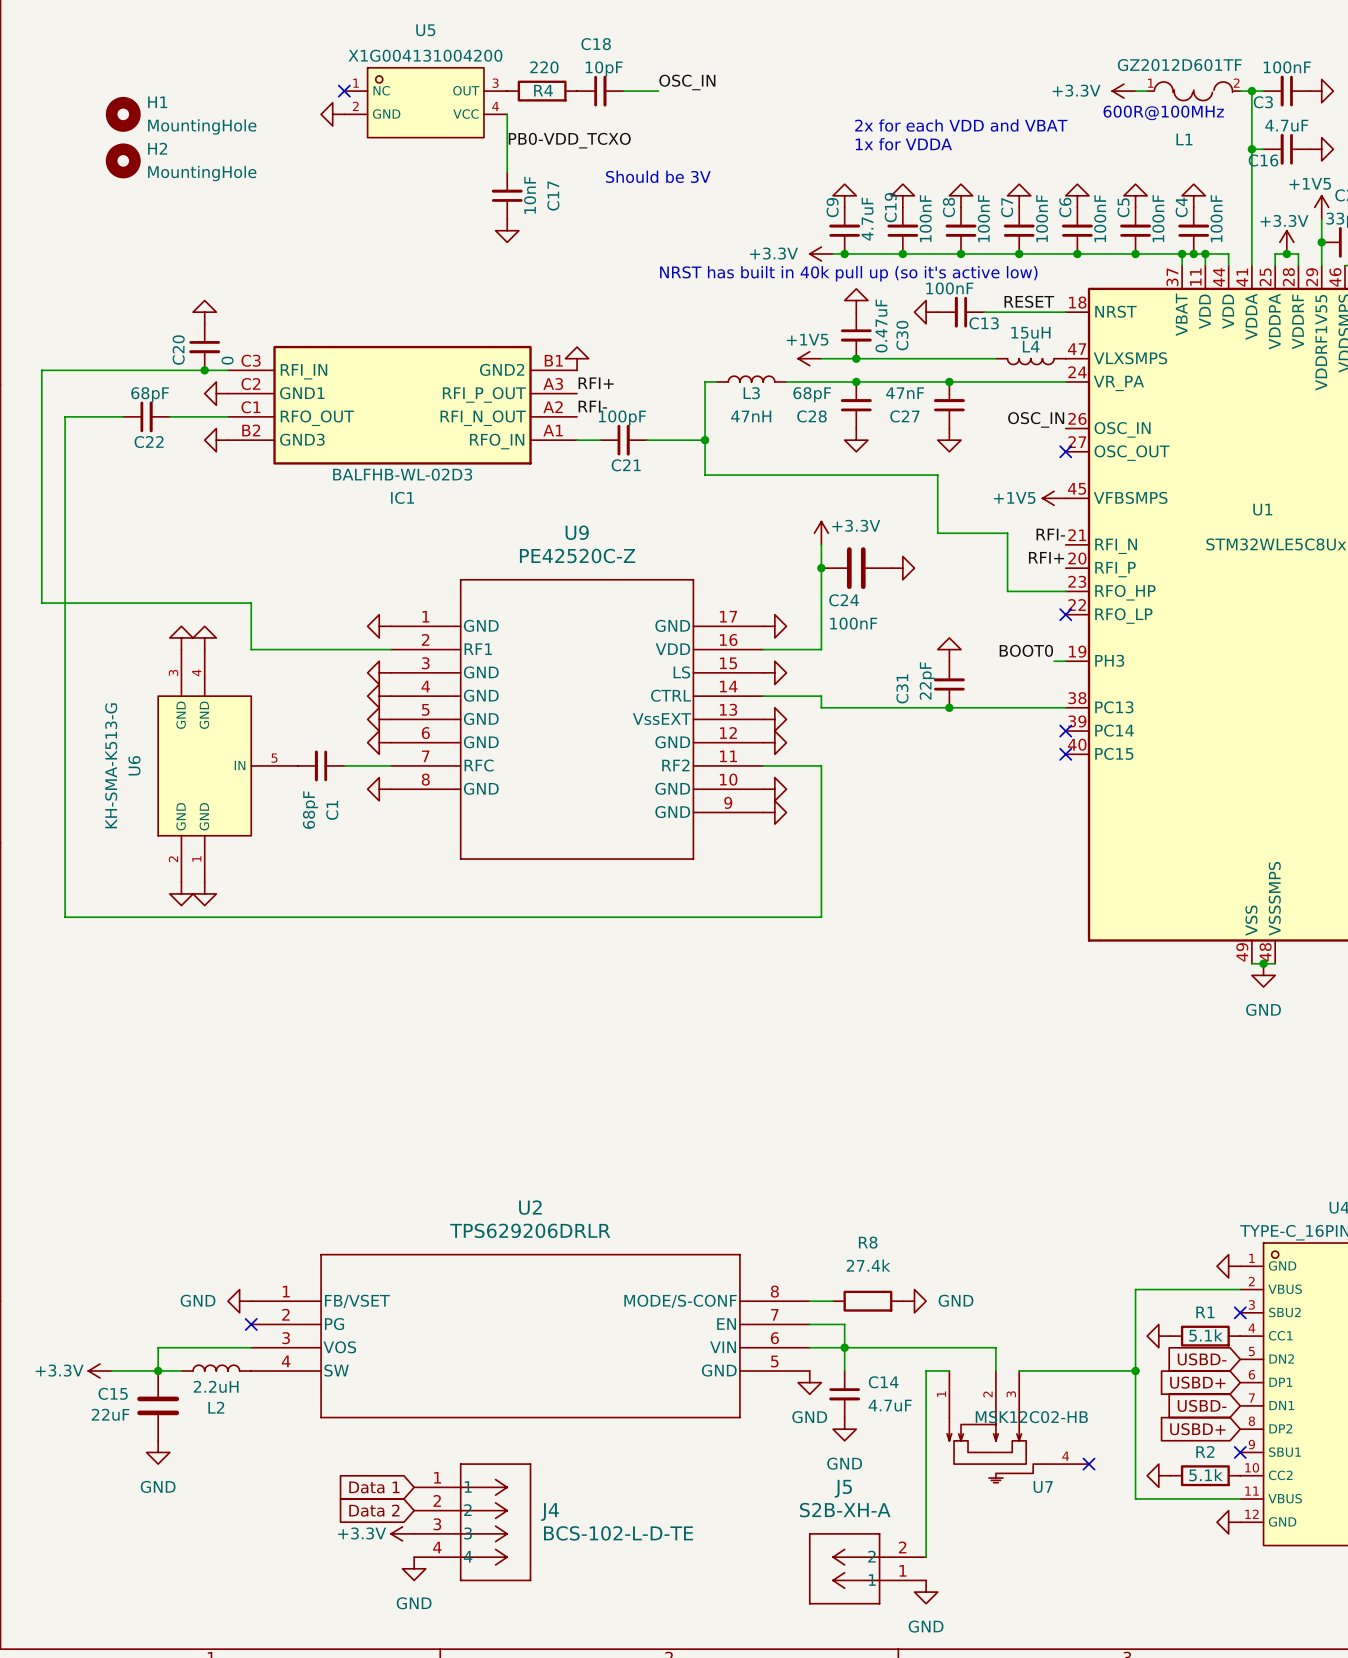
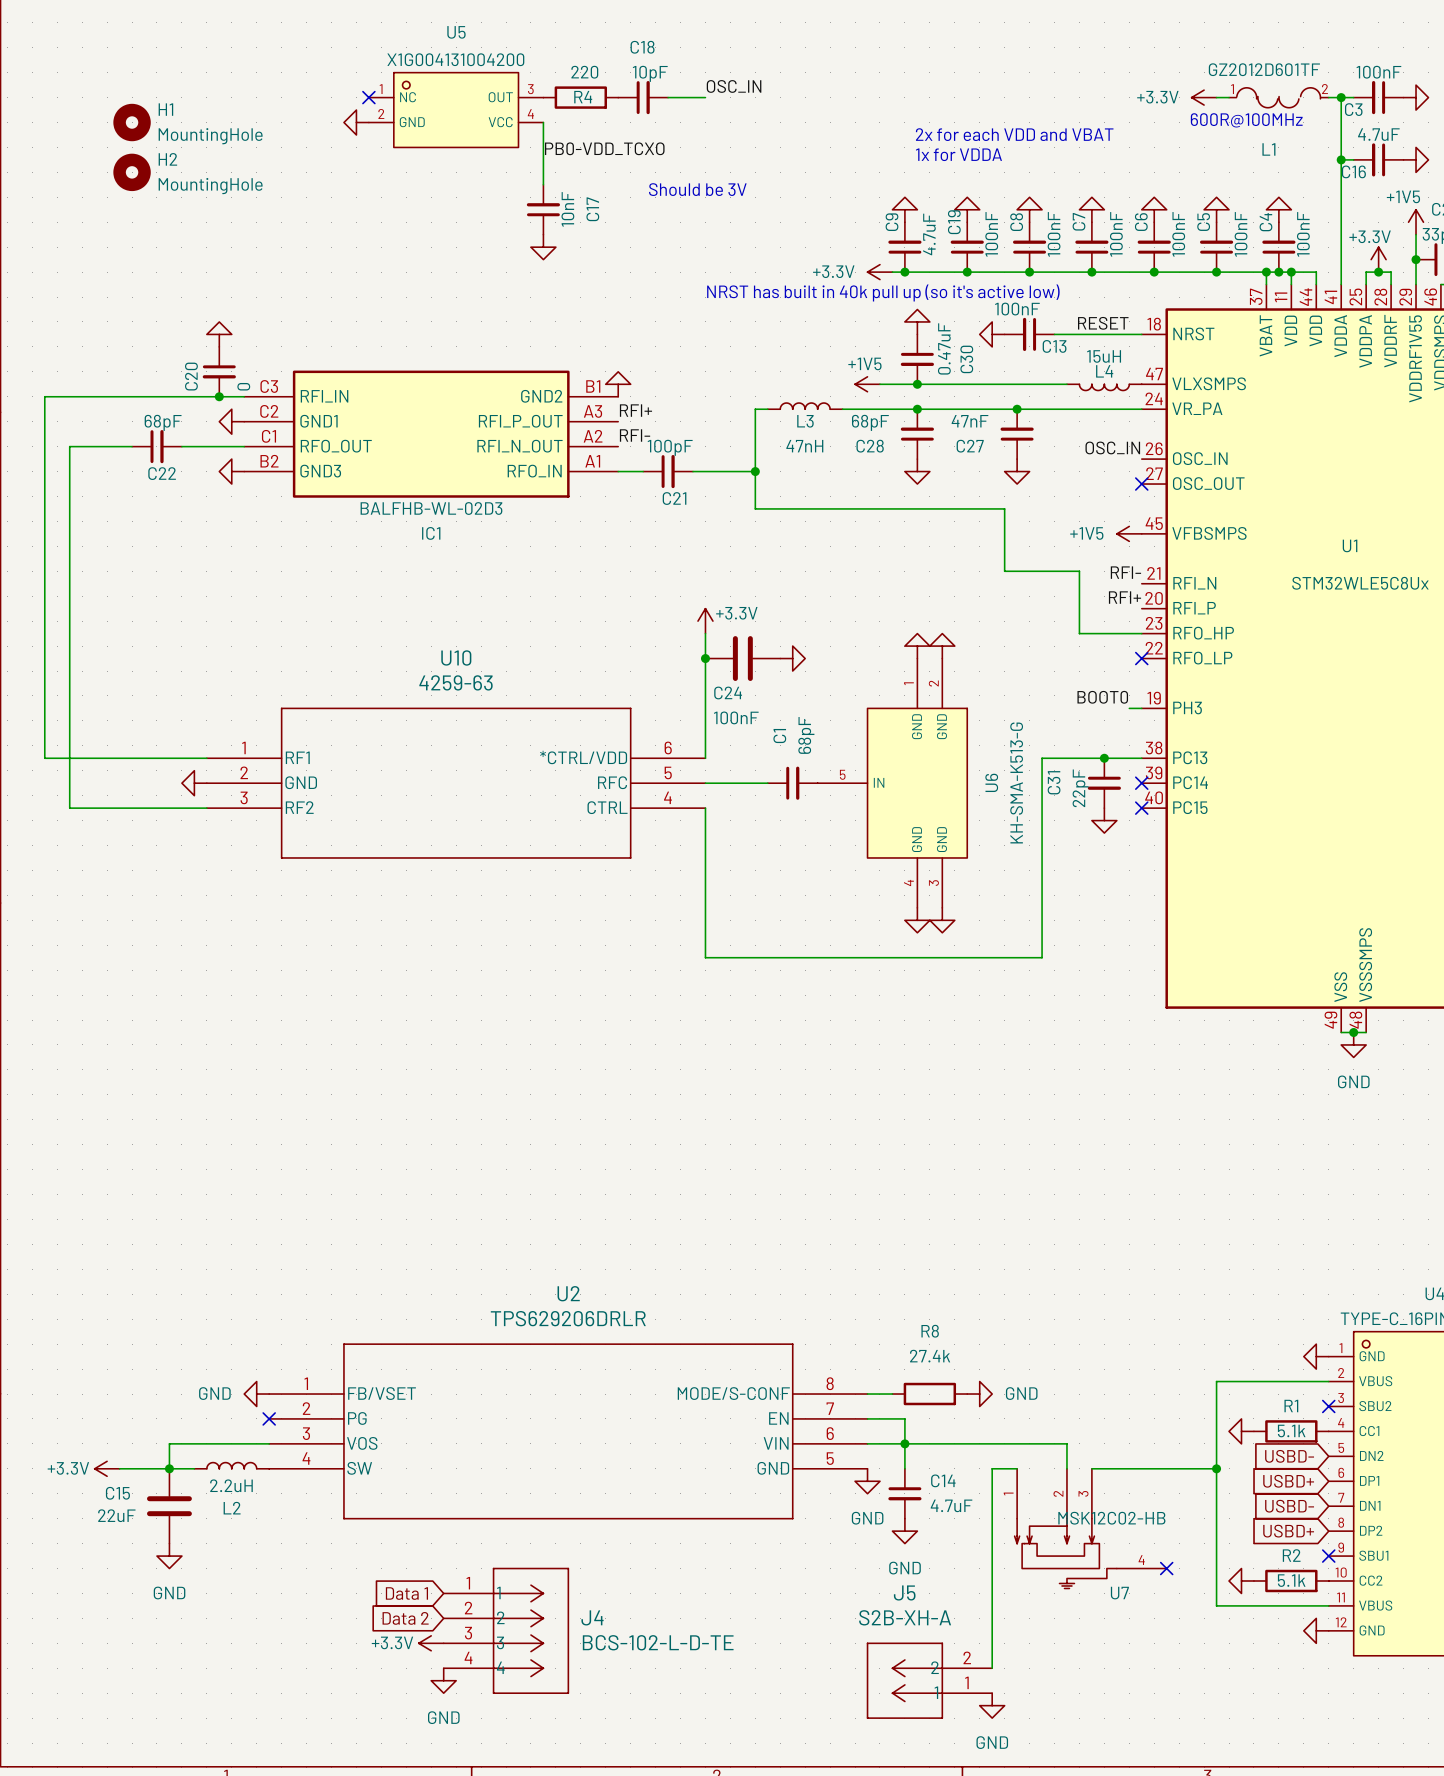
power symbol position: +3.3V (821, 533) -> +3.3V (705, 621)
wire: (821, 544) (821, 649) (763, 649) -> none
junction: (821, 568) -> none
C24 position: (856, 568) -> (742, 658)
power symbol: (902, 568) -> none
wire: none -> (705, 633) (705, 758)
wire: (41, 603) (251, 603) (251, 649) (390, 649) -> (44, 646) (44, 758) (206, 758)
power symbol: none -> (917, 646)
power symbol: none -> (942, 646)
junction: none -> (705, 658)
power symbol: none -> (792, 658)
power symbol: (379, 626) -> none
power symbol: (774, 626) -> none
power symbol: (181, 637) -> none
power symbol: (204, 637) -> none
power symbol: (949, 649) -> none
power symbol: (379, 672) -> none
power symbol: (774, 672) -> none
C31 rotation: 0° (949, 684) -> 180° (1104, 783)
C31 position: (949, 684) -> (1104, 783)
power symbol: (379, 696) -> none
wire: (763, 696) (821, 696) (821, 707) (972, 707) -> (705, 808) (705, 957) (1042, 957) (1042, 758)
junction: (949, 707) -> none
junction: none -> (1104, 758)
power symbol: (379, 719) -> none
U9: PE42520C-Z (577, 719) -> none
power symbol: (774, 719) -> none
power symbol: none -> (194, 783)
U10: none -> 4259-63 (456, 783)
wire: none -> (705, 783) (767, 783)
power symbol: (379, 742) -> none
power symbol: (774, 742) -> none
wire: (65, 754) (65, 917) (821, 917) (821, 765) (763, 765) -> (69, 808) (206, 808)
U6 rotation: 0° (204, 765) -> 180° (917, 783)
U6 position: (227, 765) -> (892, 783)
C1 rotation: 0° (321, 765) -> 180° (792, 783)
C1 position: (321, 765) -> (792, 783)
wire: (344, 765) (390, 765) -> none
power symbol: none -> (1104, 820)
power symbol: (379, 789) -> none
power symbol: (774, 789) -> none
power symbol: (774, 812) -> none
power symbol: none -> (917, 920)
power symbol: none -> (942, 920)
power symbol: (181, 893) -> none
power symbol: (204, 893) -> none

